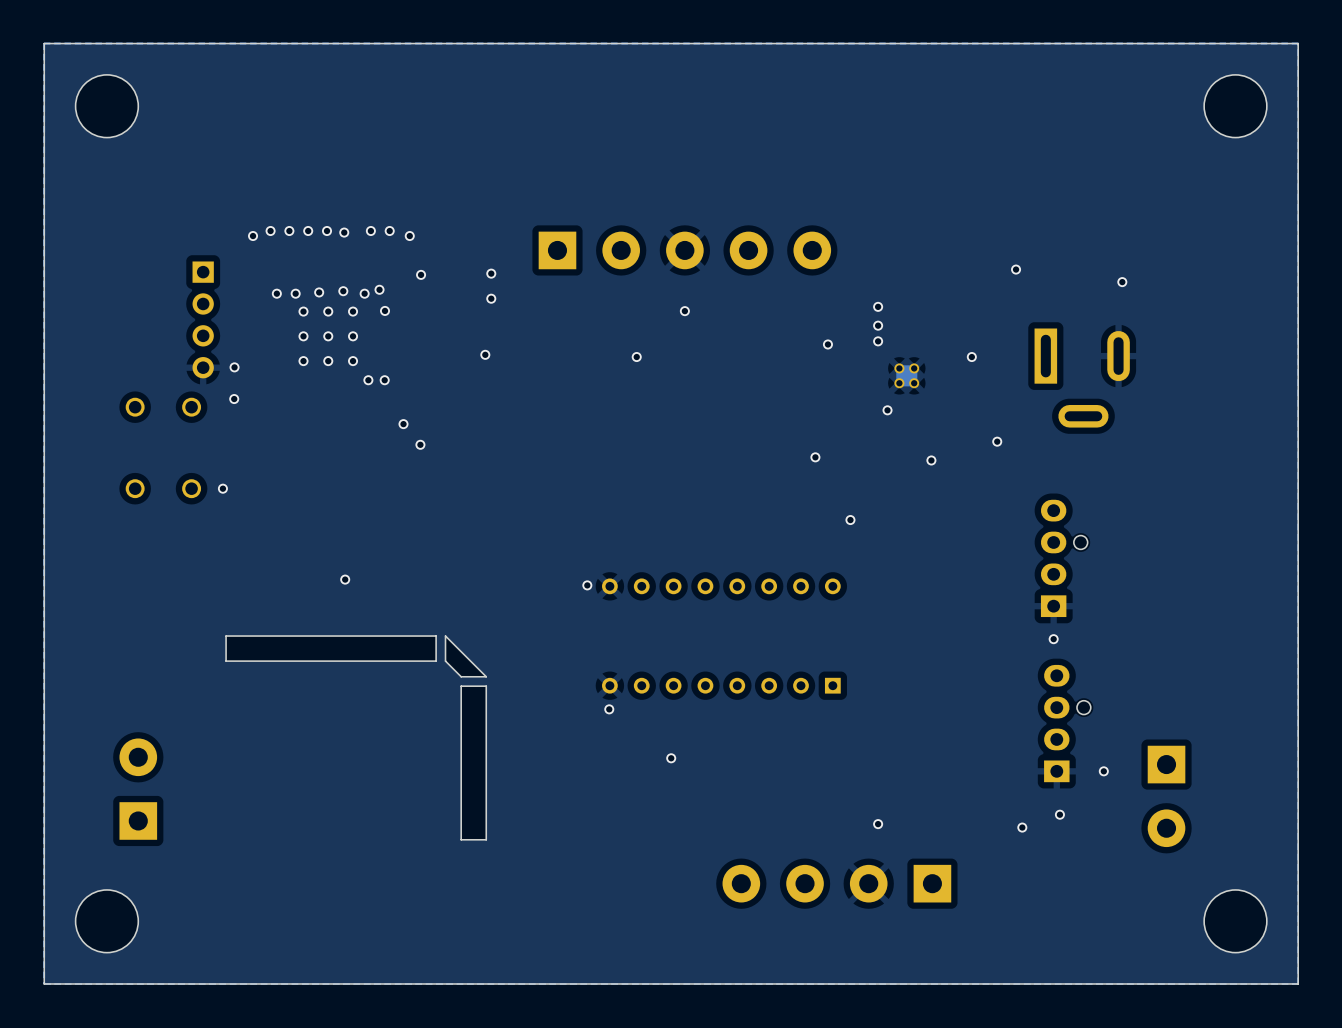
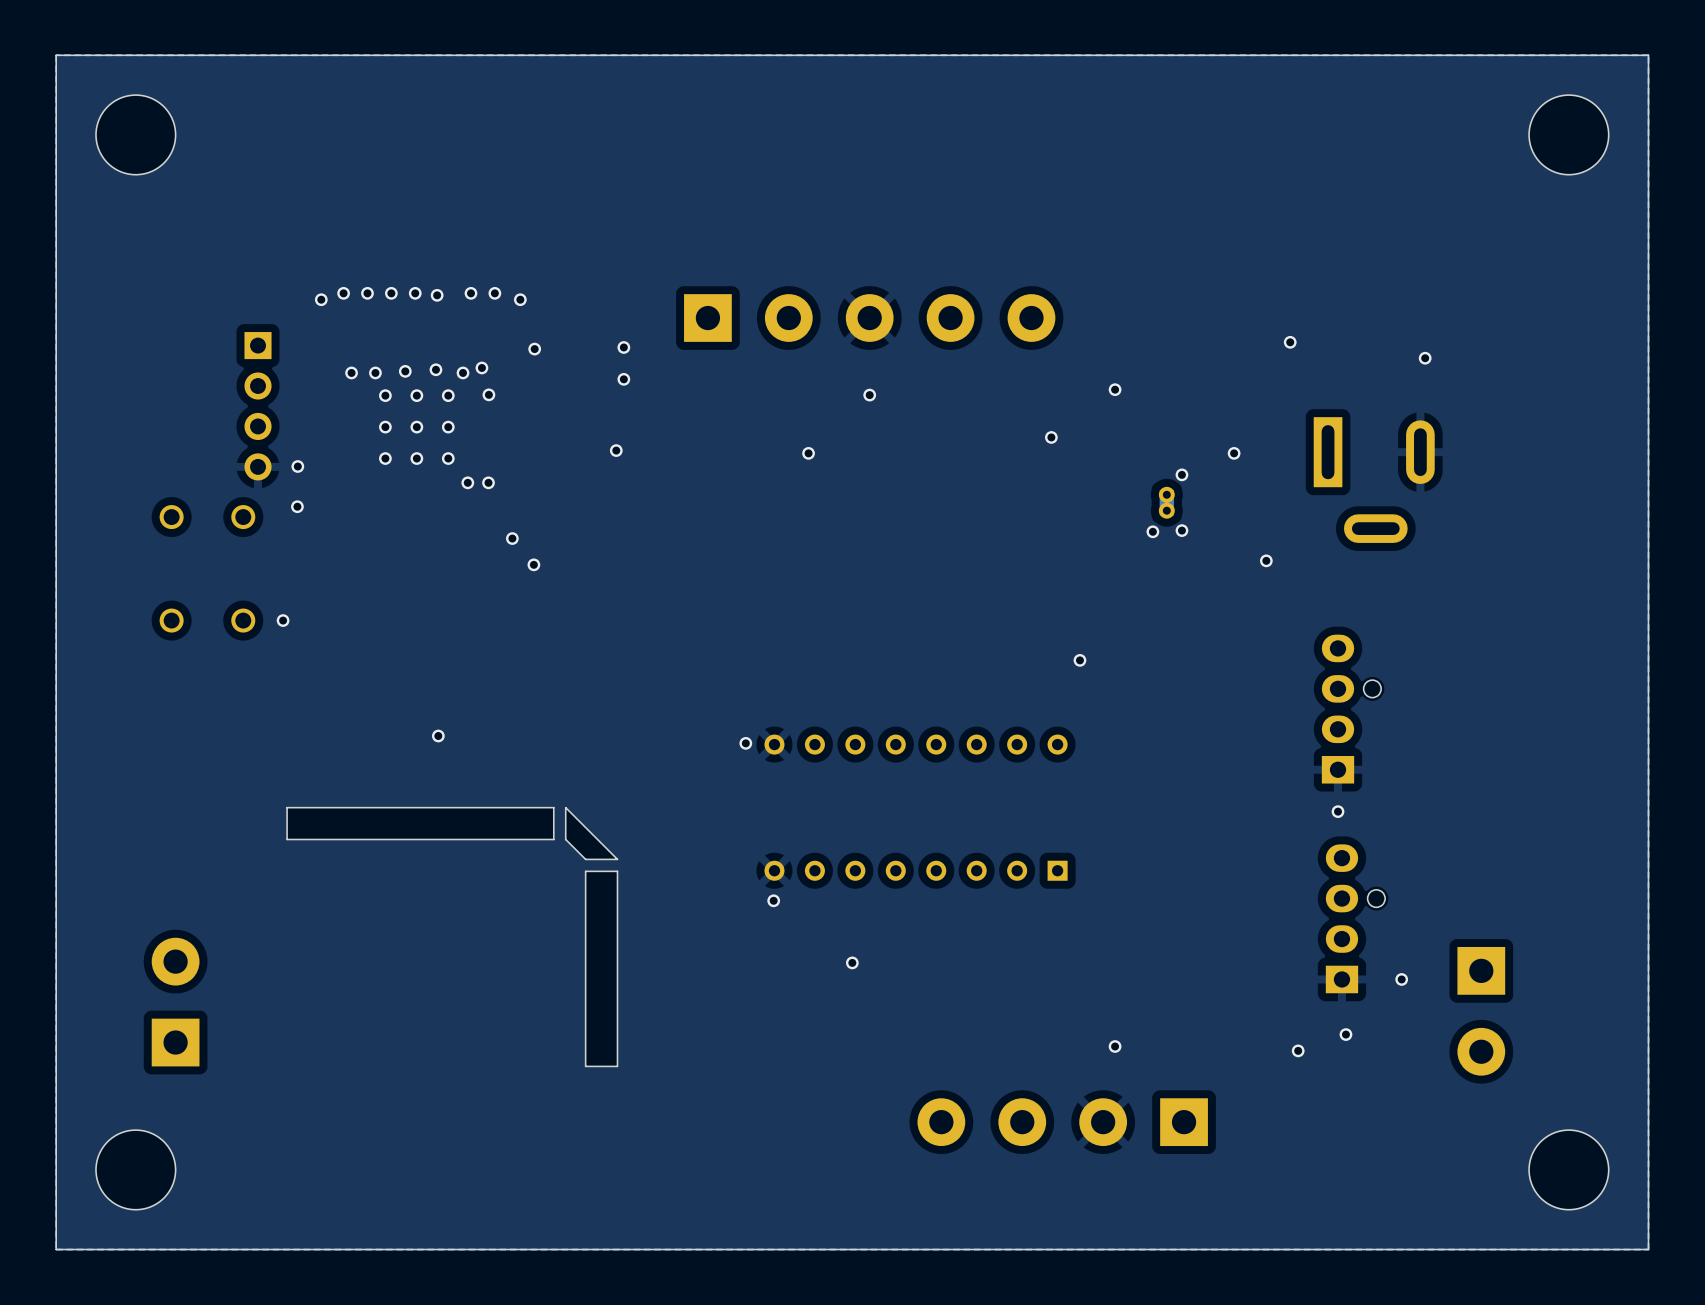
via: (878, 325) -> none
via: (878, 341) -> none
via: none -> (1181, 474)
part: (906, 375) -> none
part: none -> (1166, 502)
via: (887, 410) -> none
via: none -> (1181, 530)
via: none -> (1152, 531)
via: (815, 457) -> none
via: (931, 460) -> none

